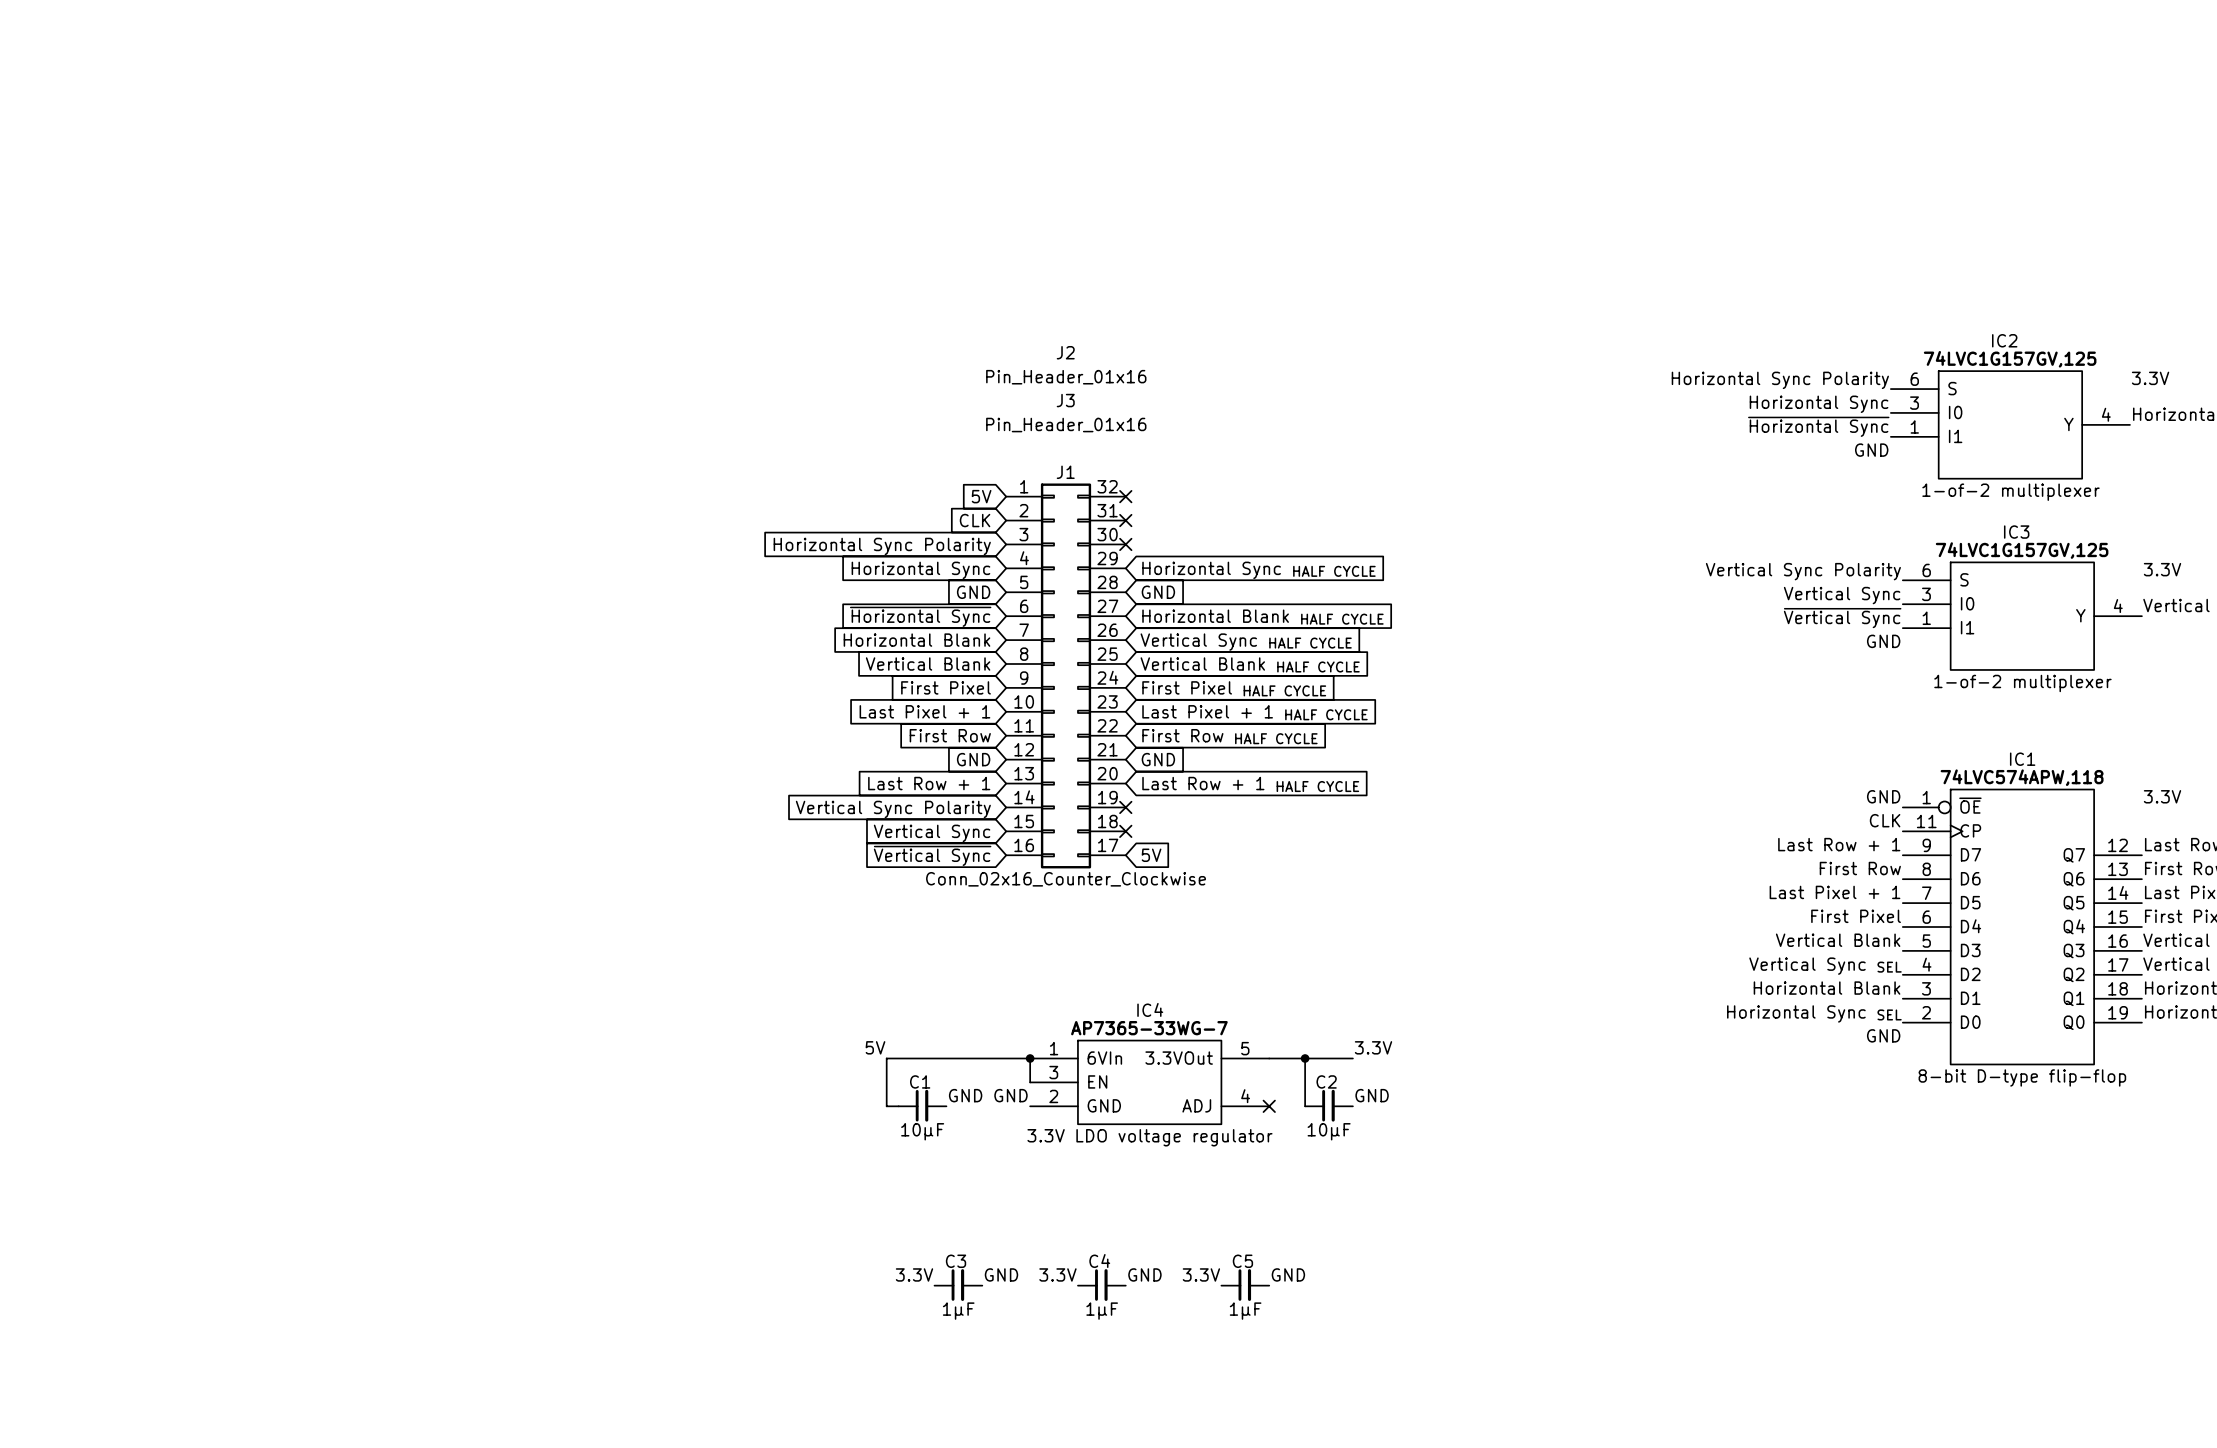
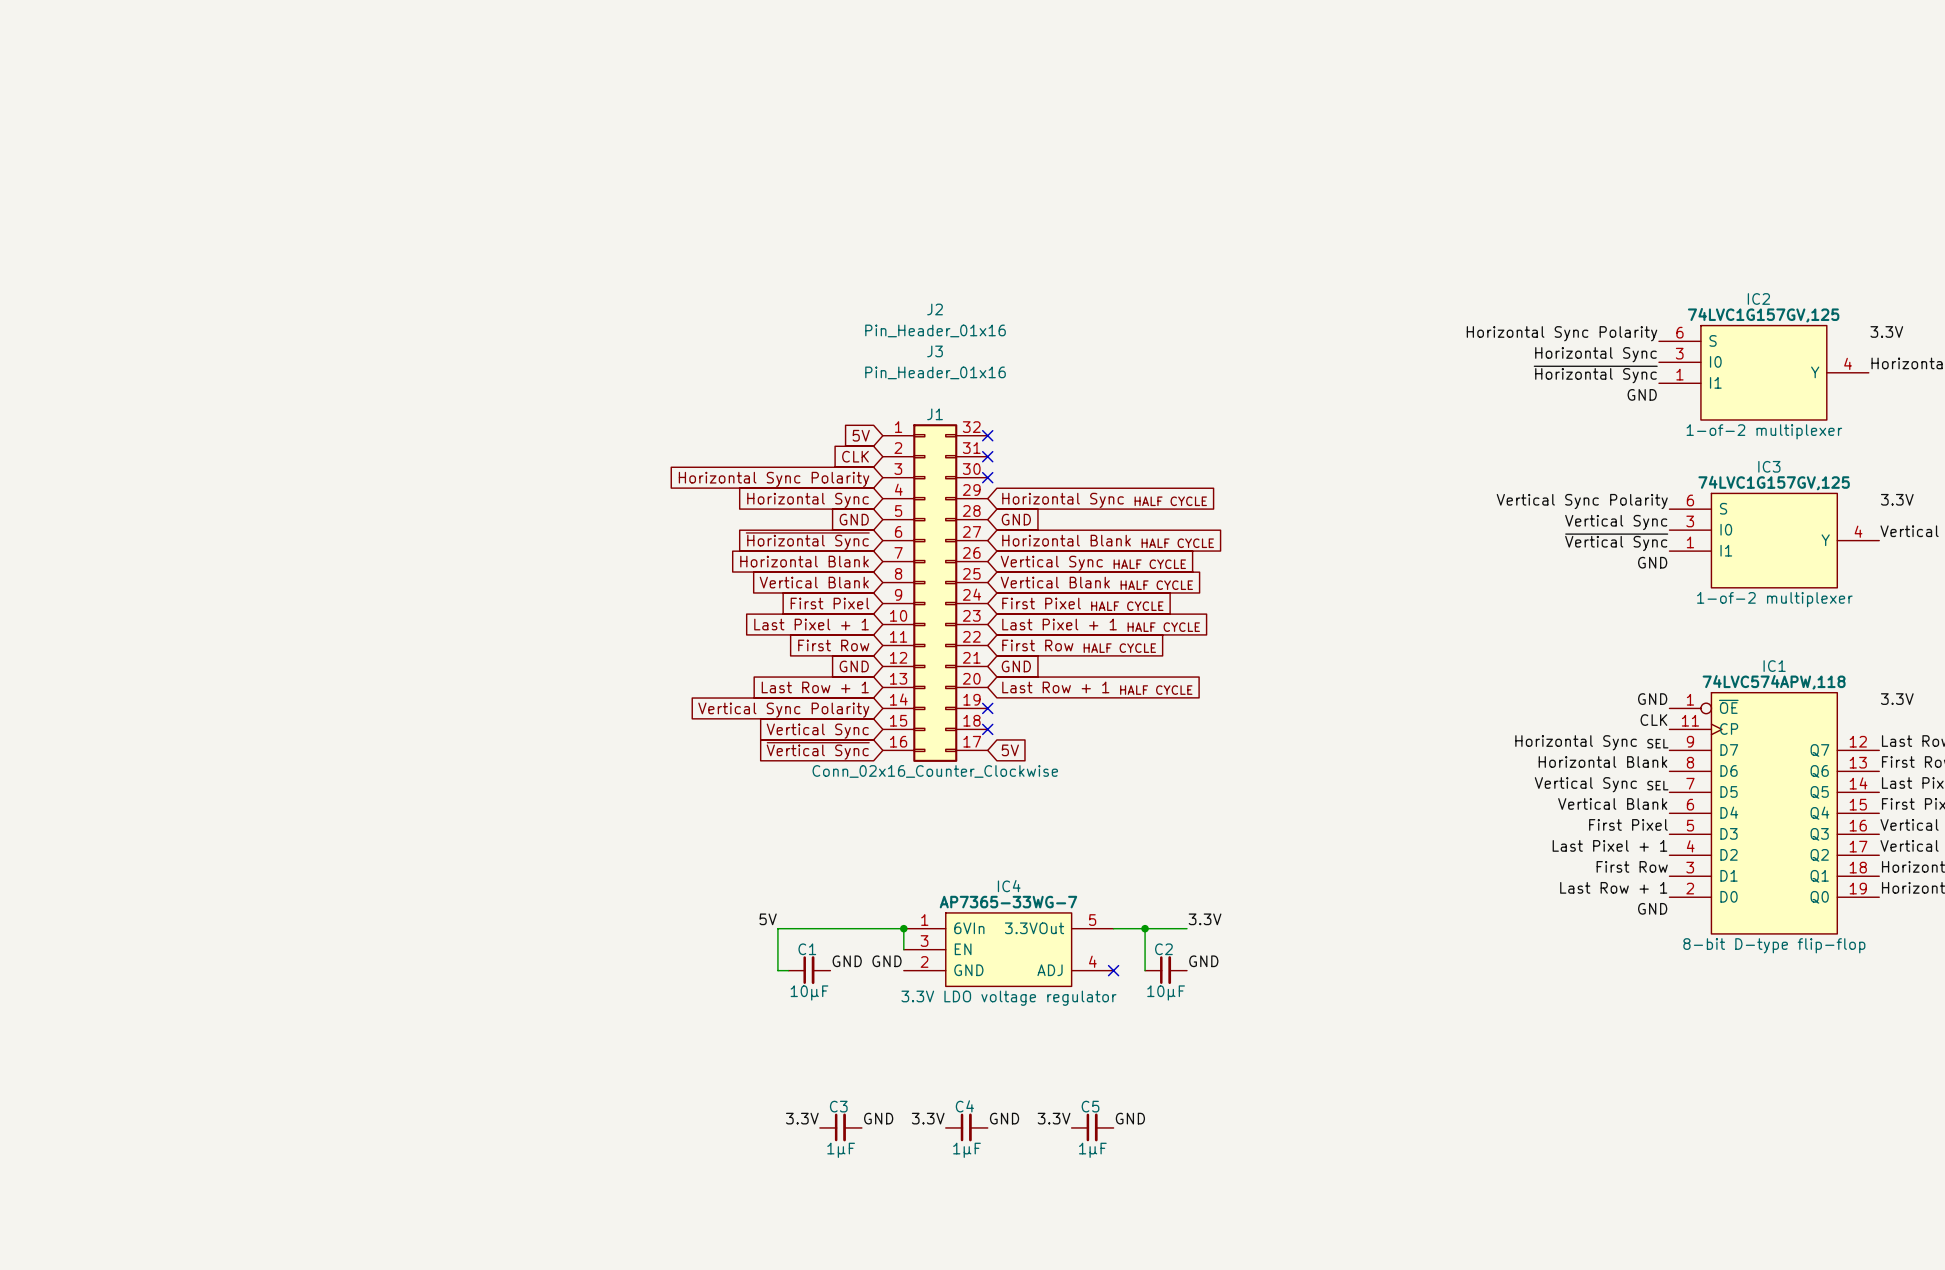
label: Last Row + 1 (1839, 844) -> Horizontal Sync SEL (1591, 742)
label: First Row (1860, 868) -> Horizontal Blank (1602, 762)
label: Last Pixel + 1 (1834, 892) -> Vertical Sync SEL (1601, 784)
label: First Pixel (1856, 916) -> Vertical Blank (1612, 803)
label: Vertical Blank (1838, 940) -> First Pixel (1628, 824)
label: Vertical Sync SEL (1825, 966) -> Last Pixel + 1 (1609, 845)
label: Horizontal Blank (1827, 988) -> First Row (1632, 866)
label: Horizontal Sync SEL (1814, 1013) -> Last Row + 1 (1613, 887)

